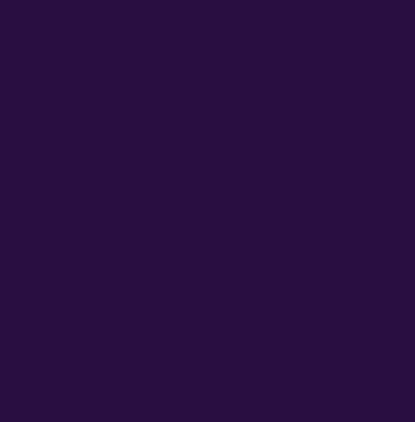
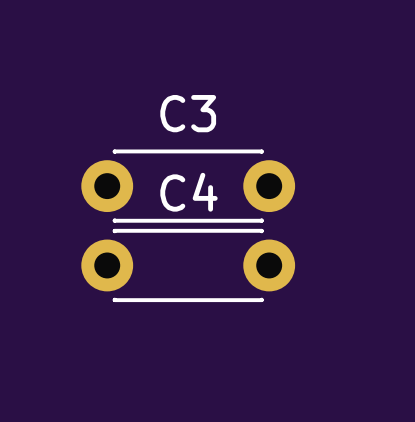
C3: none -> (188, 186)
C4: none -> (188, 265)

